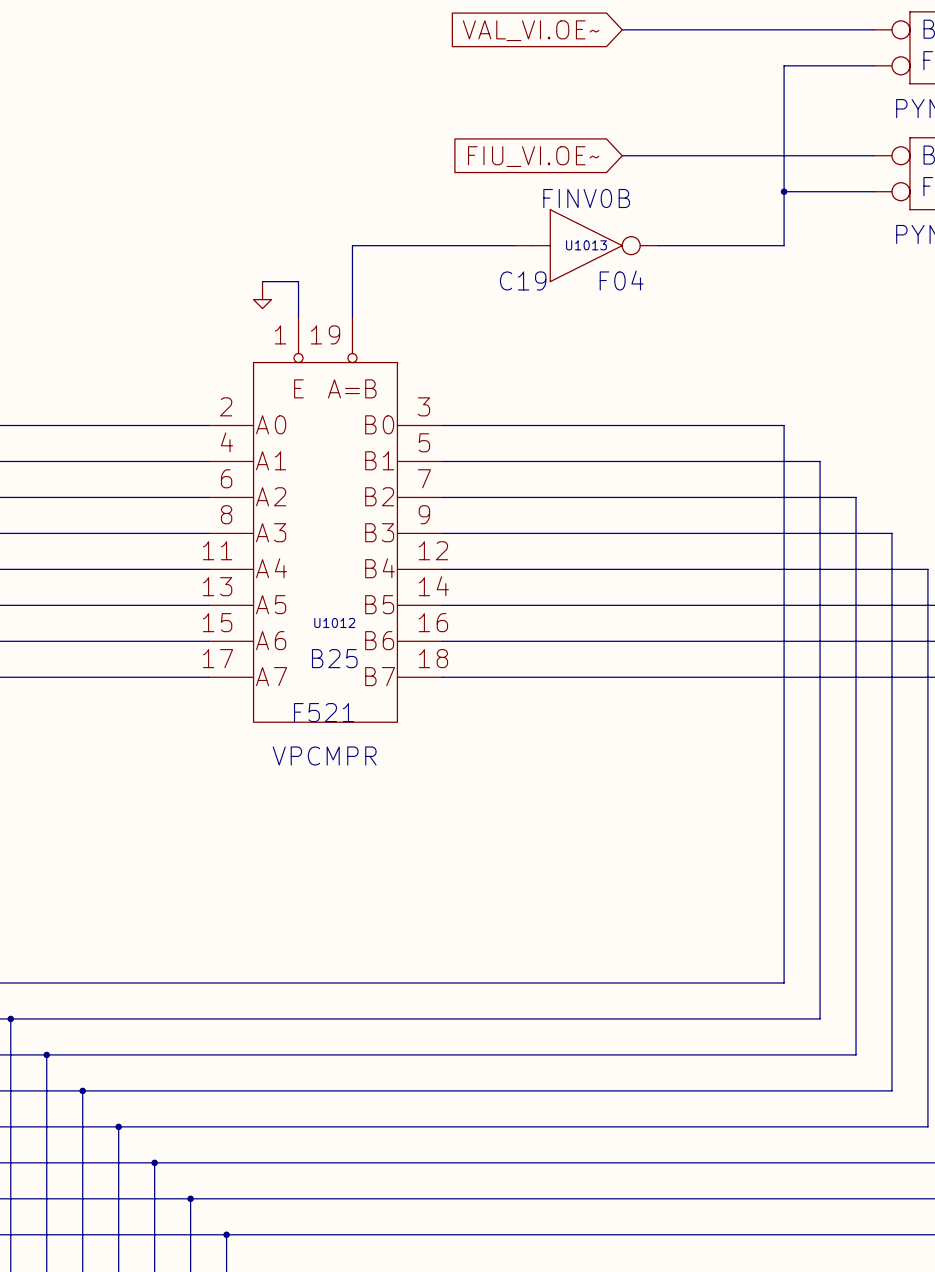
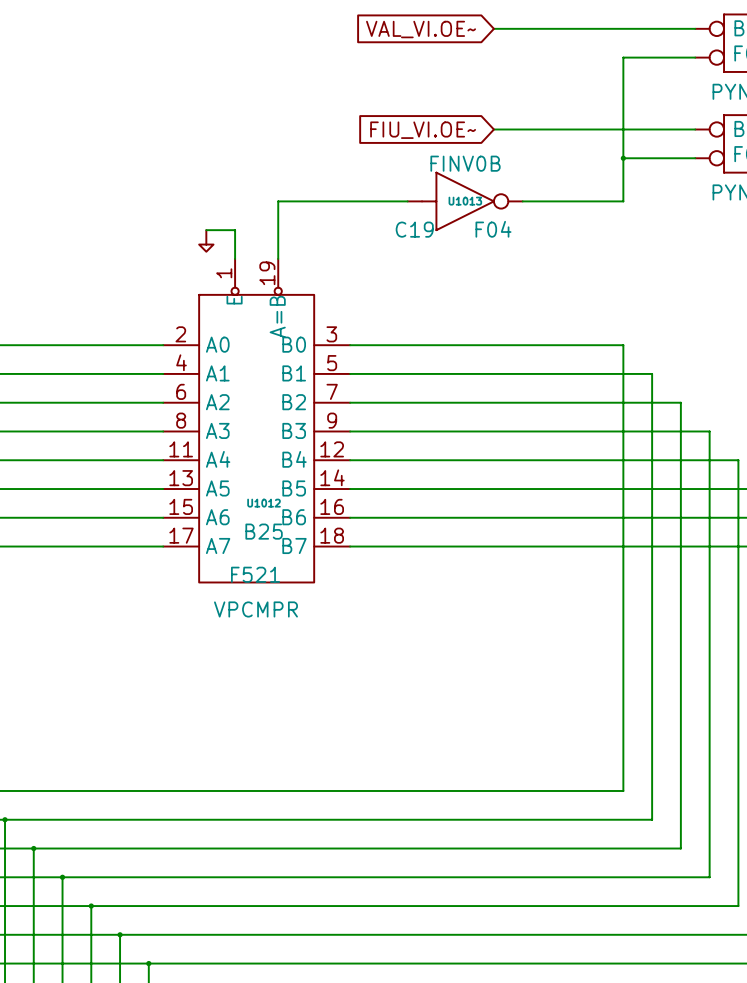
U1012 symbol: [208, 317, 443, 723] -> [163, 258, 351, 583]

